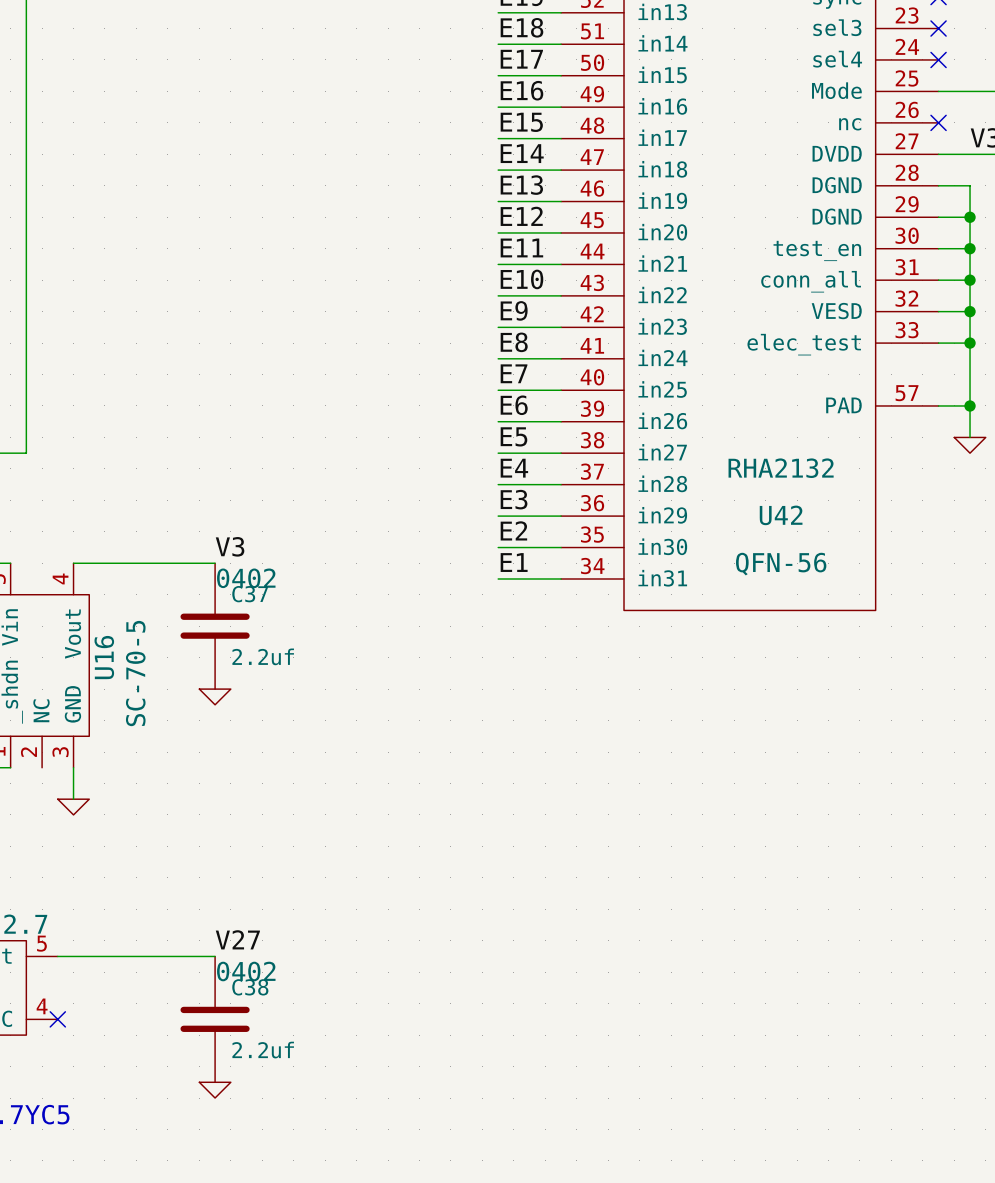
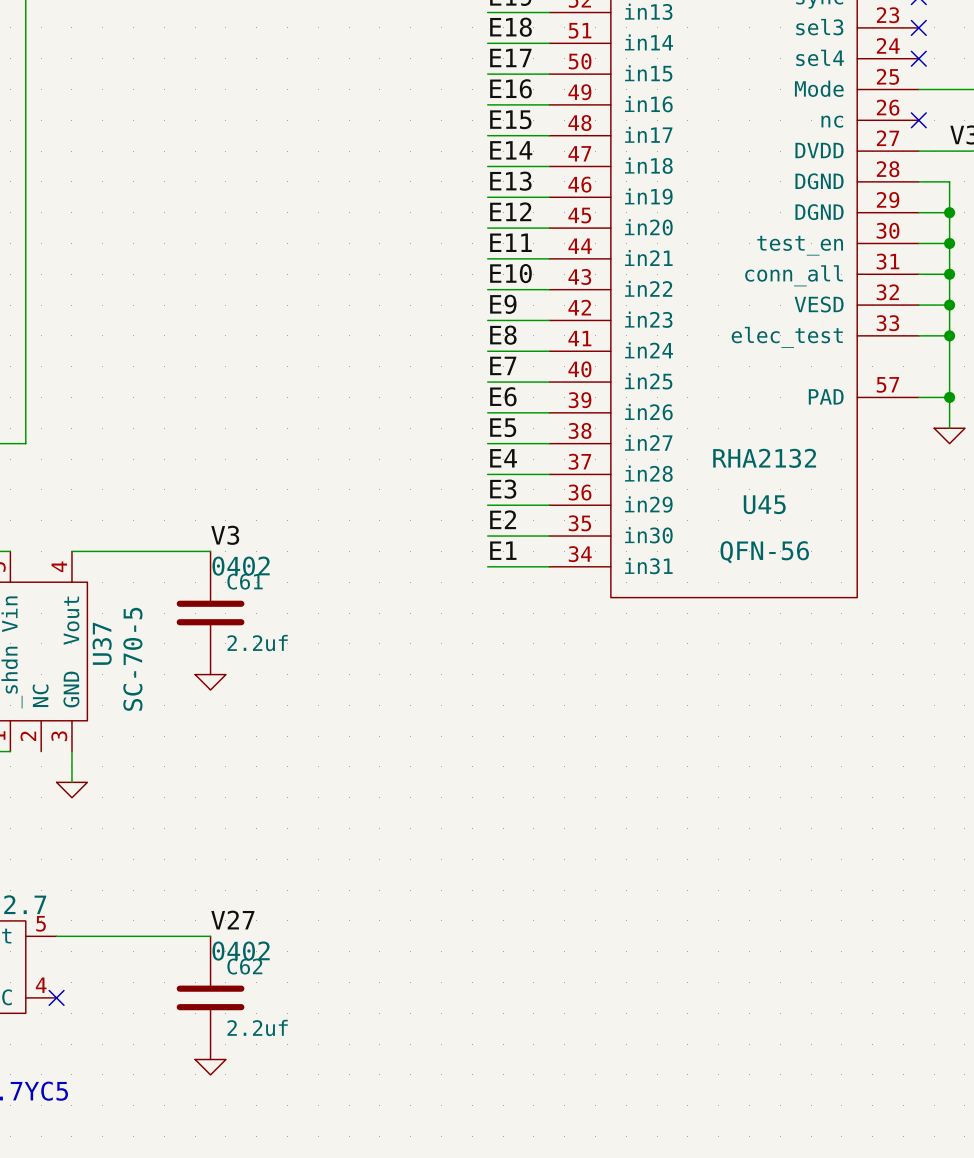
U42 name: U42 (781, 515) -> U45 (764, 504)
C37 name: C37 (250, 594) -> C61 (245, 581)
U16 name: U16 (104, 657) -> U37 (102, 643)
C38 name: C38 (250, 987) -> C62 (244, 966)

